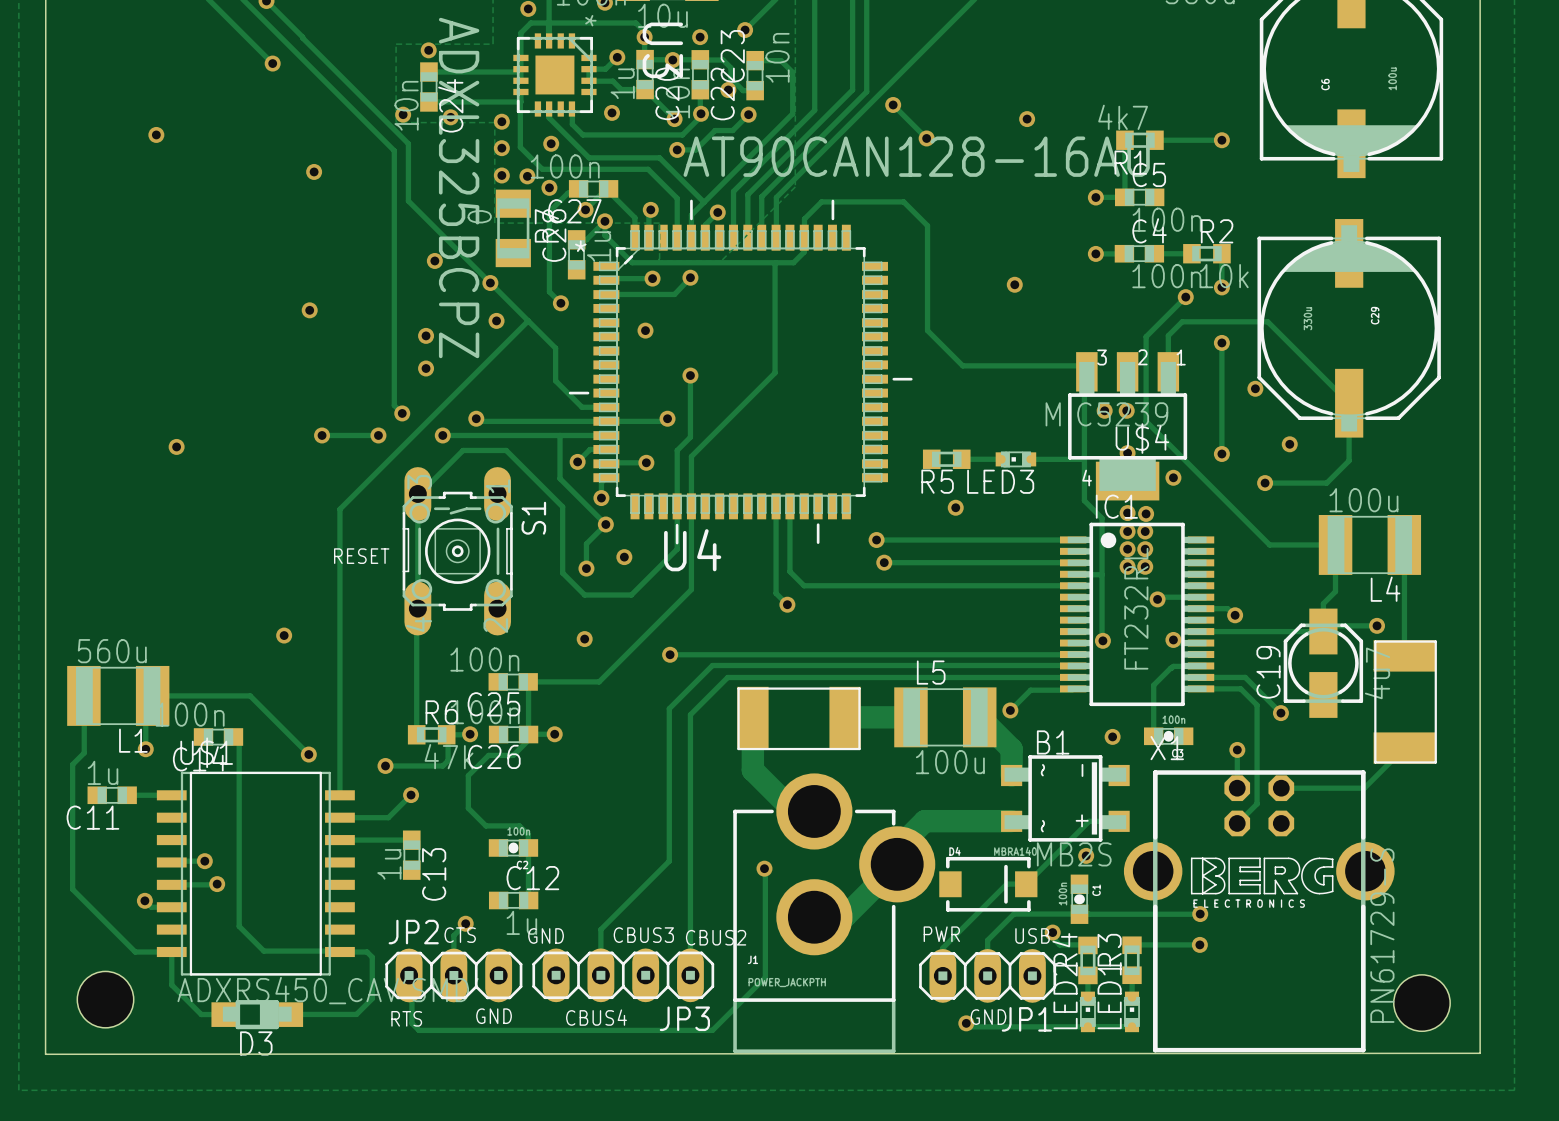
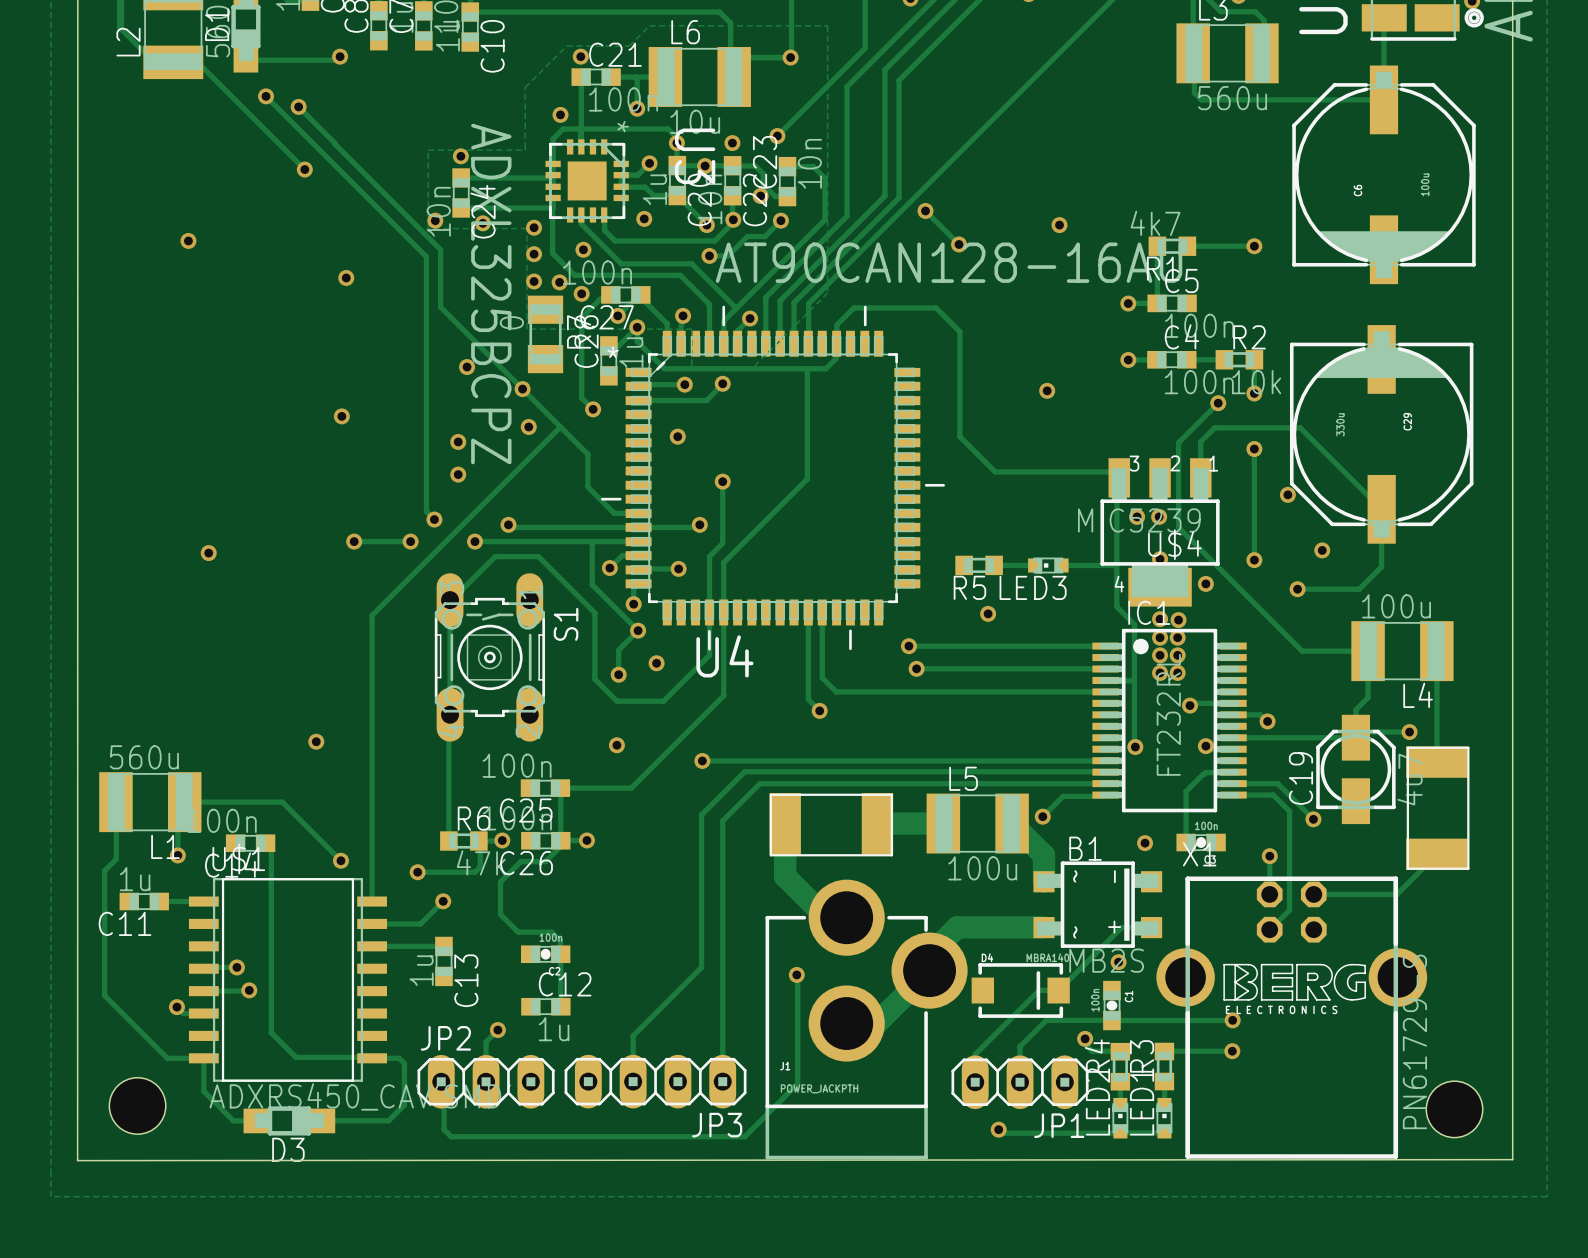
text: RESET (361, 556) -> none
text: PWR (941, 934) -> none
text: CTS (460, 935) -> none
text: GND (546, 935) -> none
text: CBUS3 (643, 935) -> none
text: USB (1032, 935) -> none
text: CBUS2 (716, 937) -> none
text: GND (494, 1016) -> none
text: CBUS4 (596, 1017) -> none
text: GND (988, 1017) -> none
text: RTS (406, 1018) -> none

